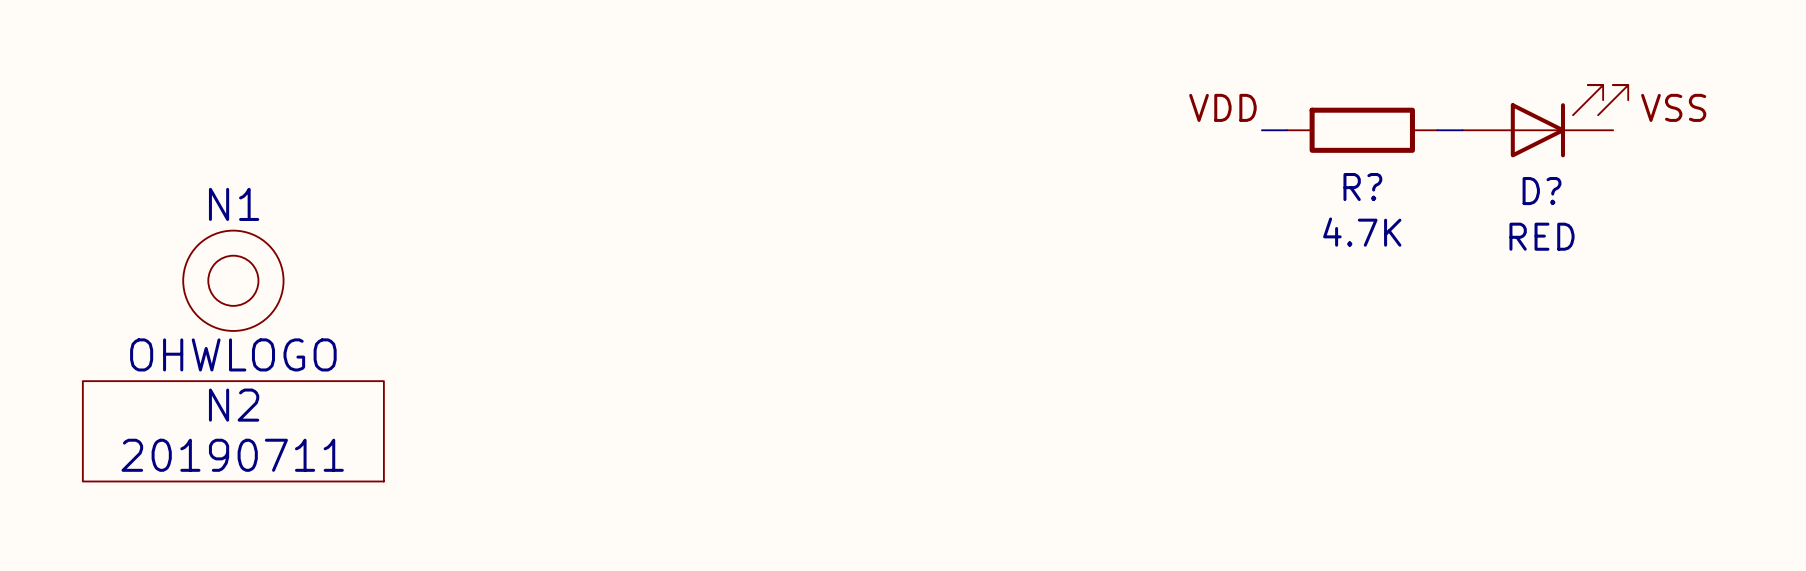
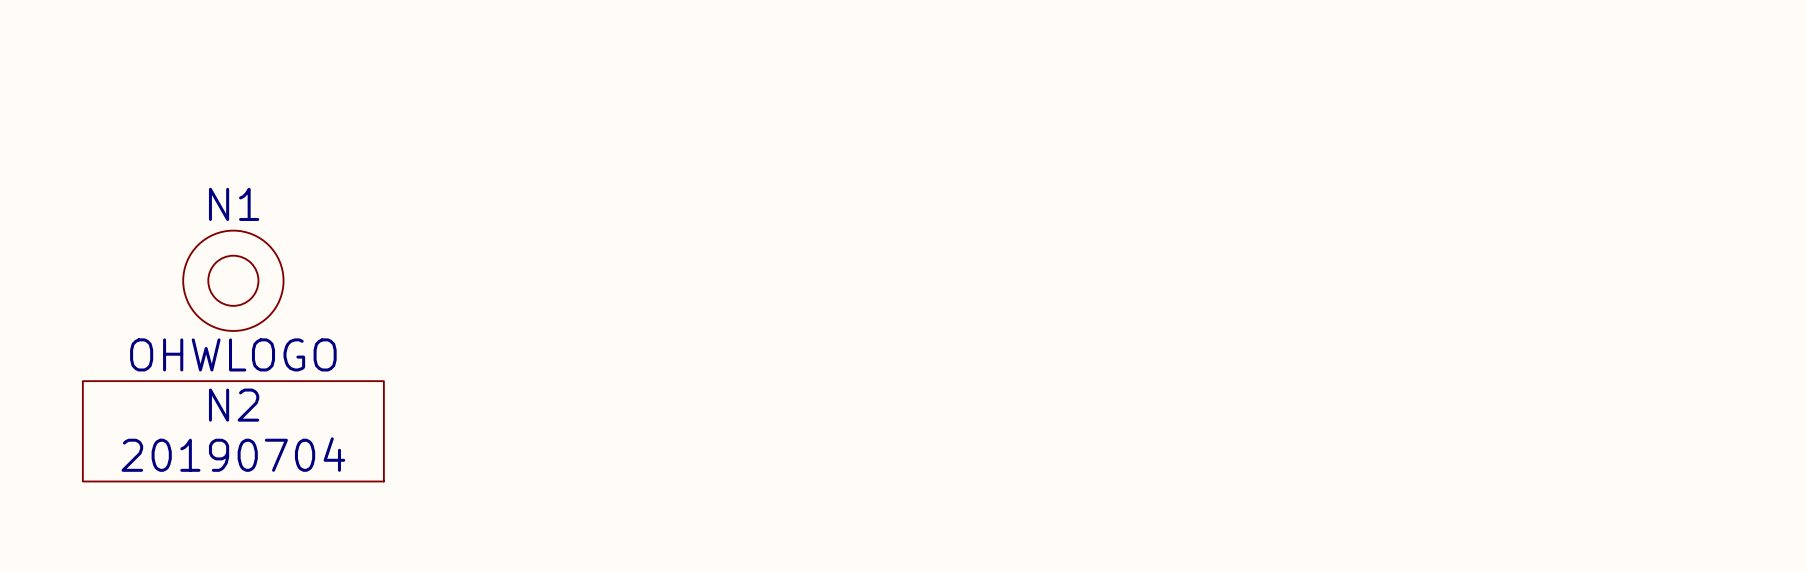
label: VDD (1222, 107) -> none
label: VSS (1673, 107) -> none
D?: RED (1545, 121) -> none
wire: (1261, 130) (1287, 130) -> none
R?: 4.7K (1362, 130) -> none
wire: (1437, 130) (1462, 130) -> none
N2 value: 20190711 (232, 455) -> 20190704 (233, 454)

